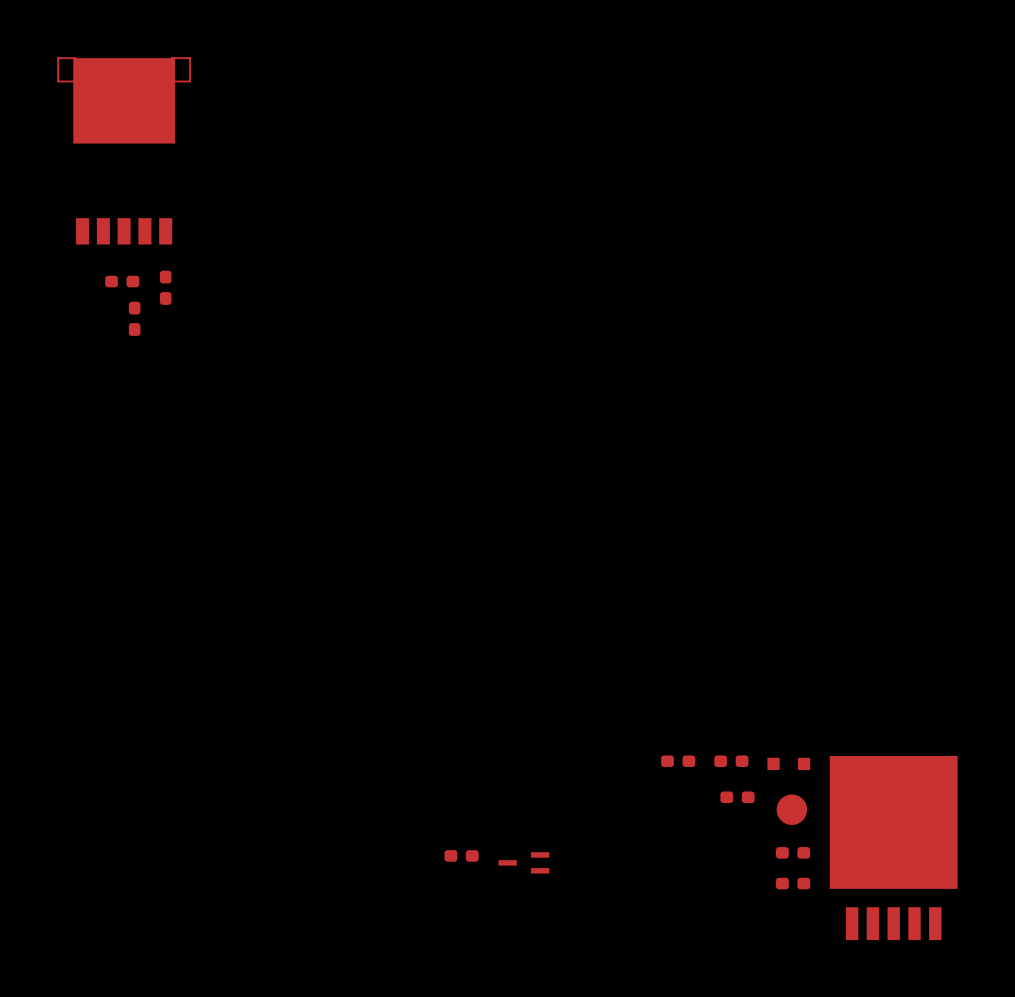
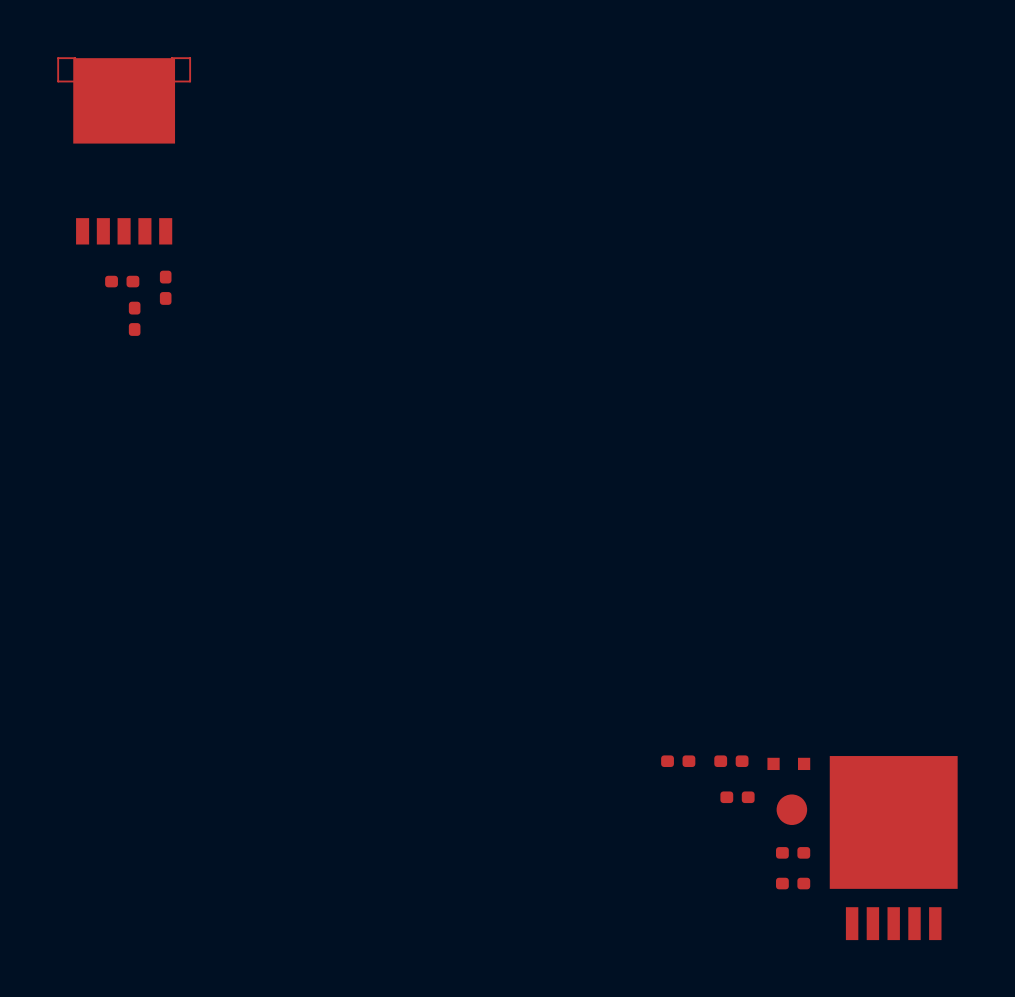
part: (461, 855) -> none
part: (523, 862) -> none

